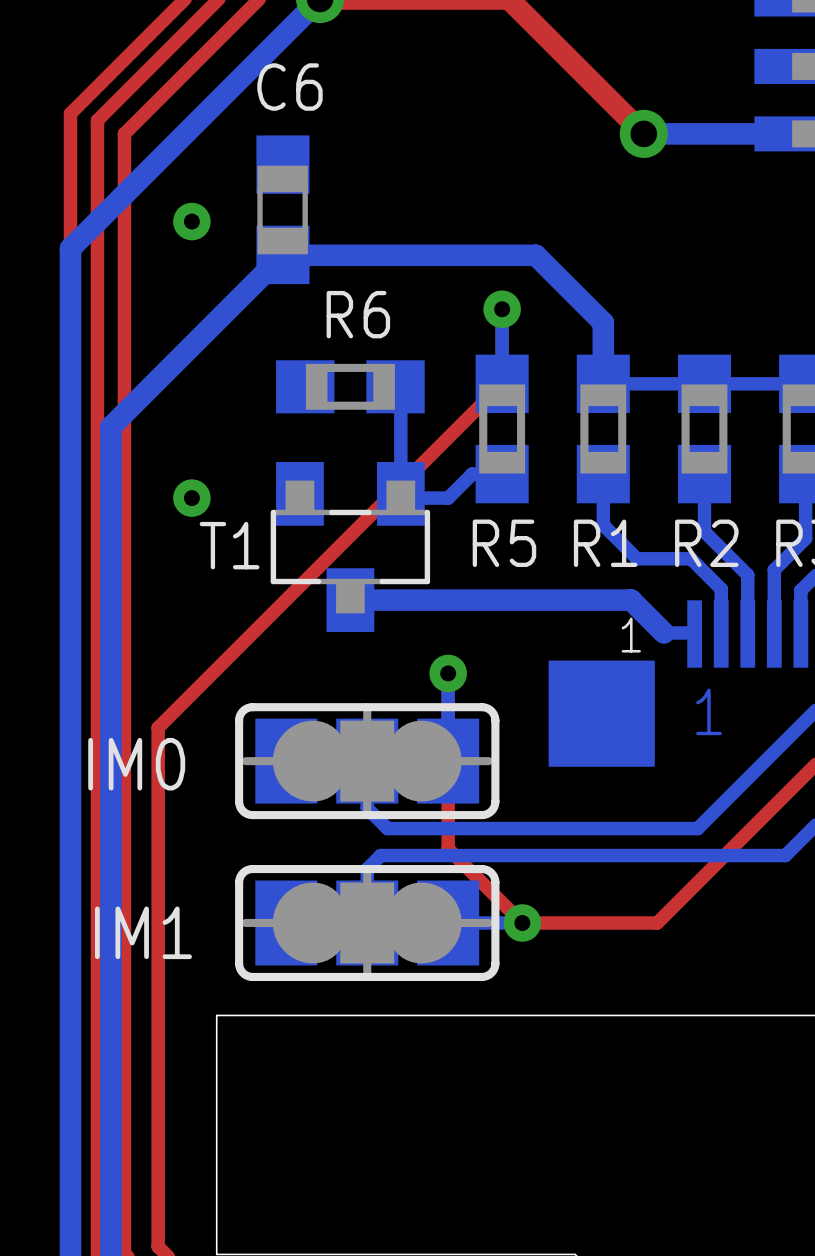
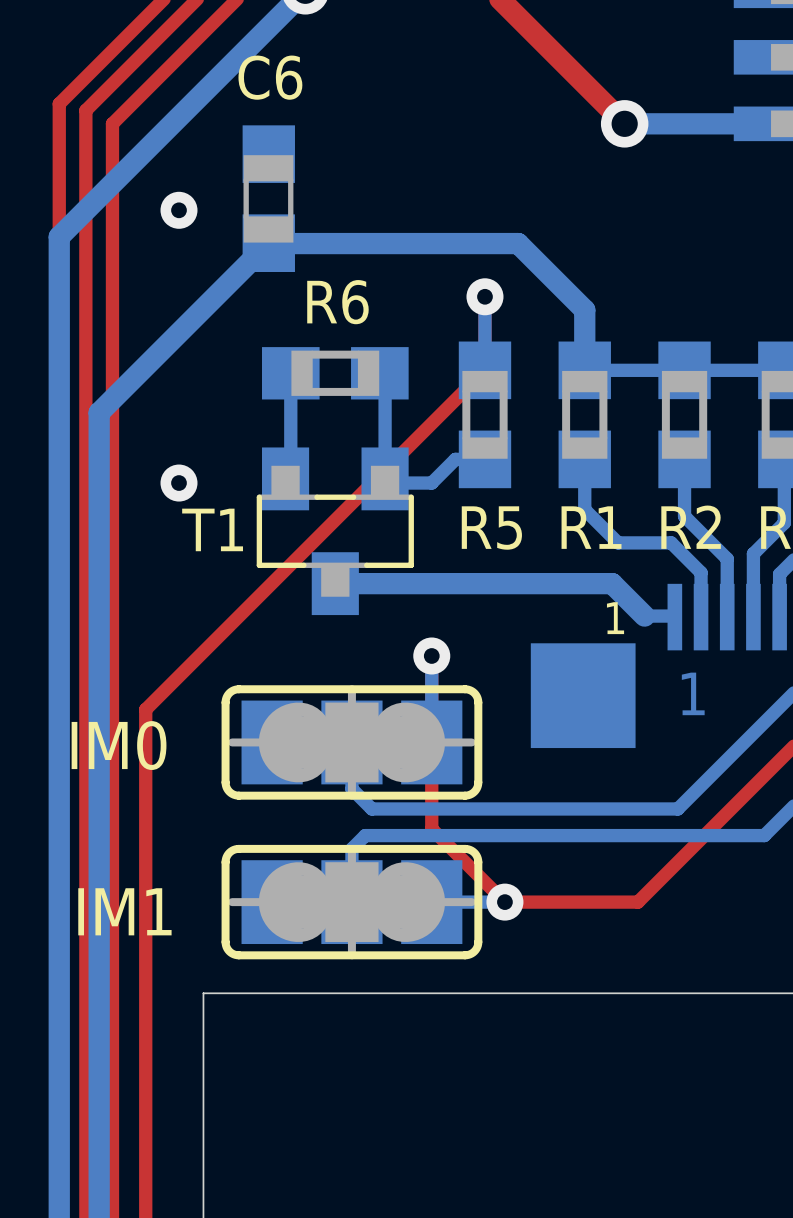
bottom track: none -> (290, 373) (290, 473)

